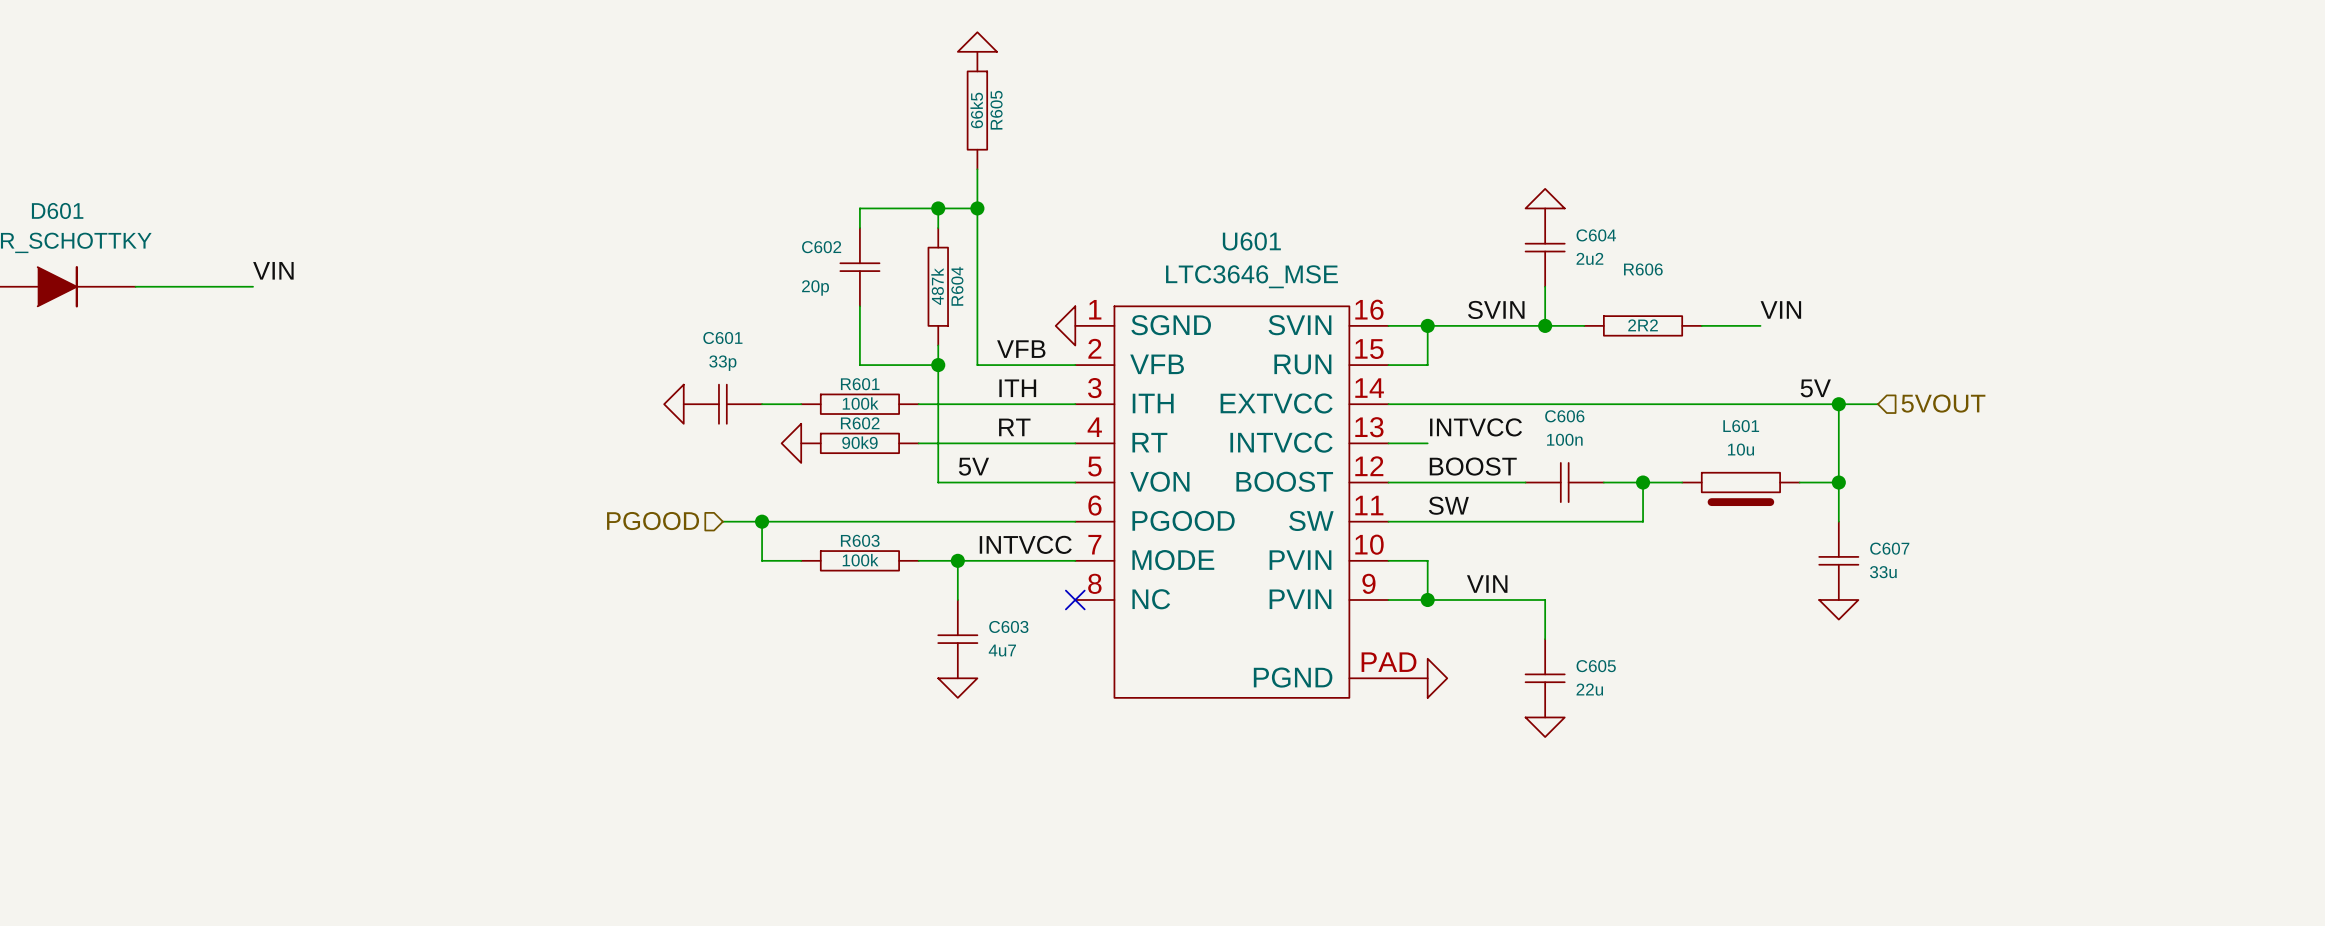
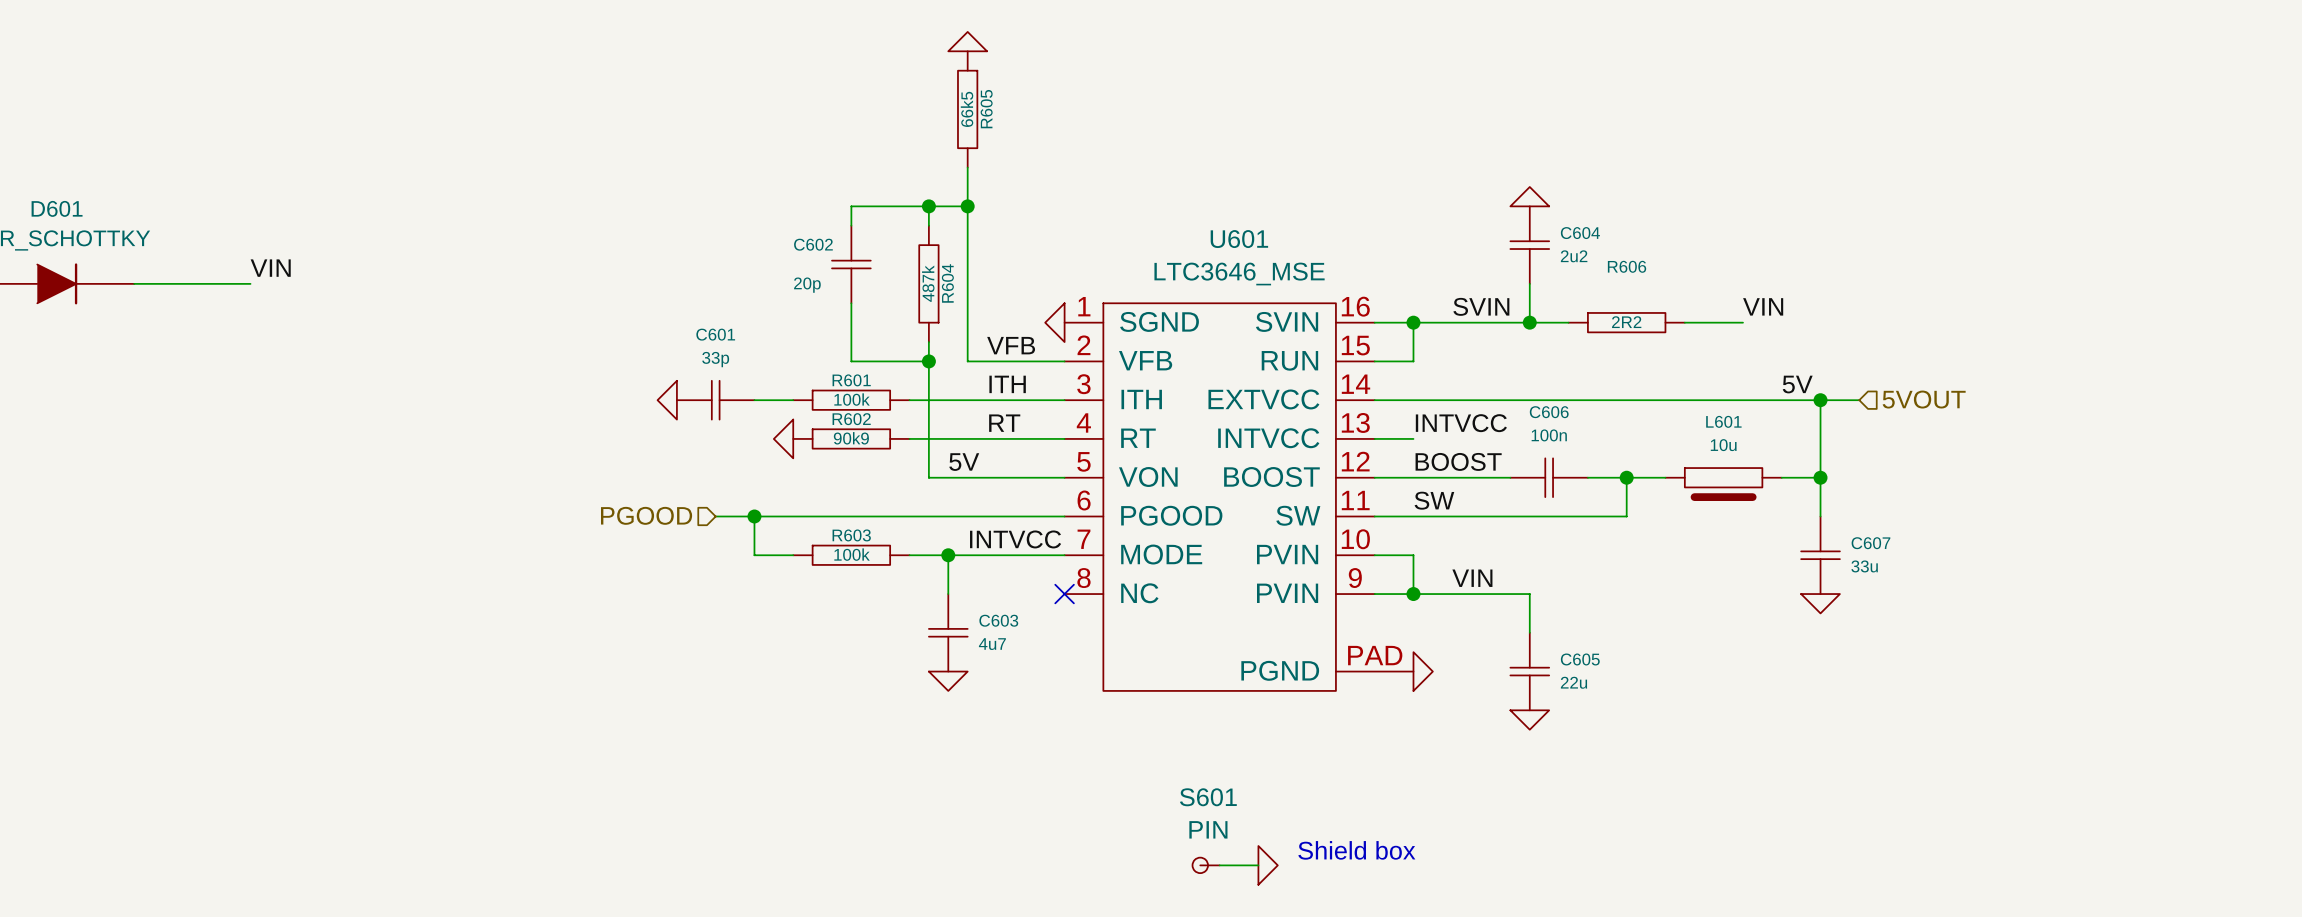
text: none -> Shield box (1356, 850)
S601: none -> PIN (1206, 865)
wire: none -> (1219, 865) (1258, 865)
power symbol: none -> (1268, 865)

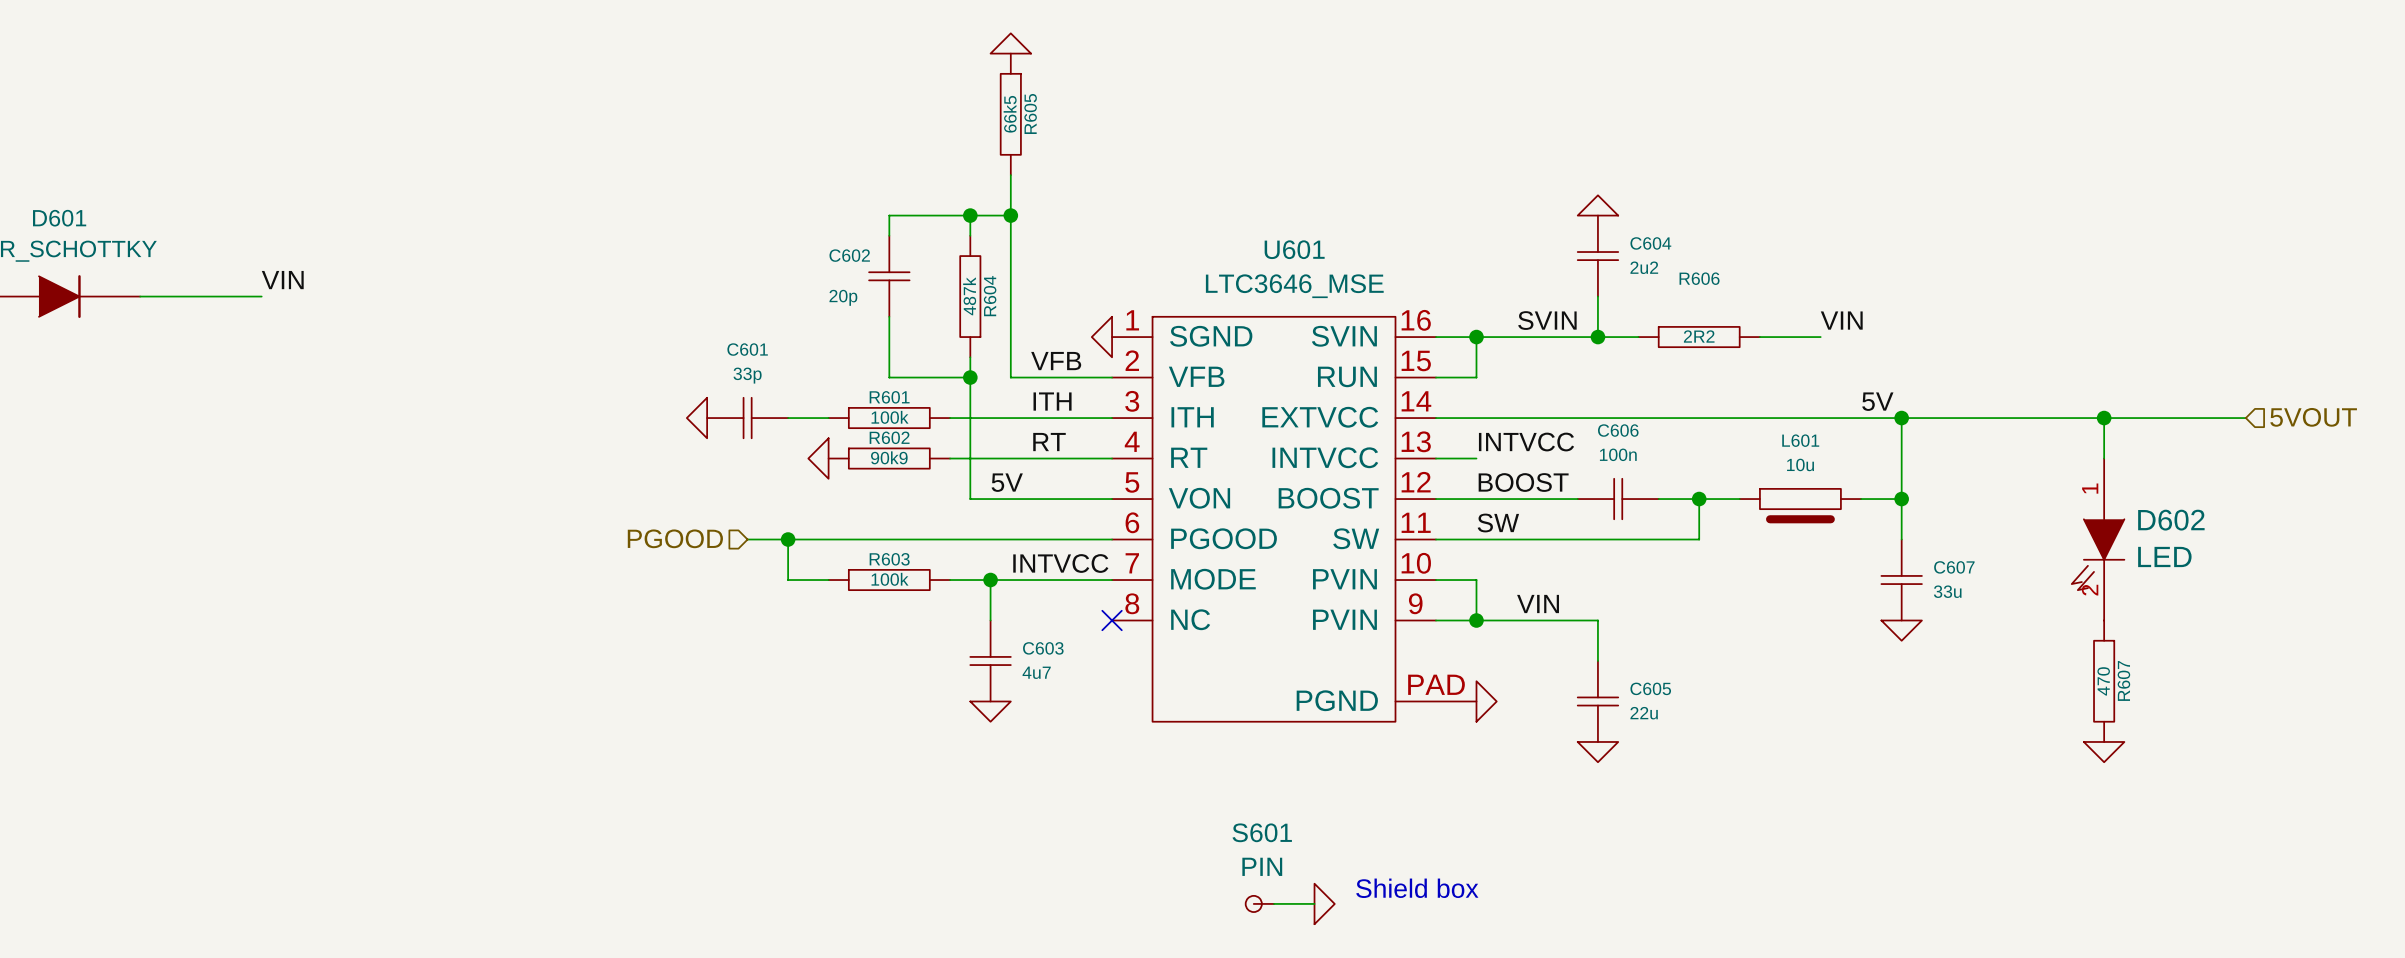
hierarchical label position: 5VOUT (1924, 399) -> 5VOUT (2313, 417)
wire: none -> (1942, 418) (2245, 418)
wire: none -> (2104, 418) (2104, 458)
junction: none -> (2104, 418)
D602: none -> LED (2098, 539)
R607: none -> 470 (2104, 681)
power symbol: none -> (2104, 752)

